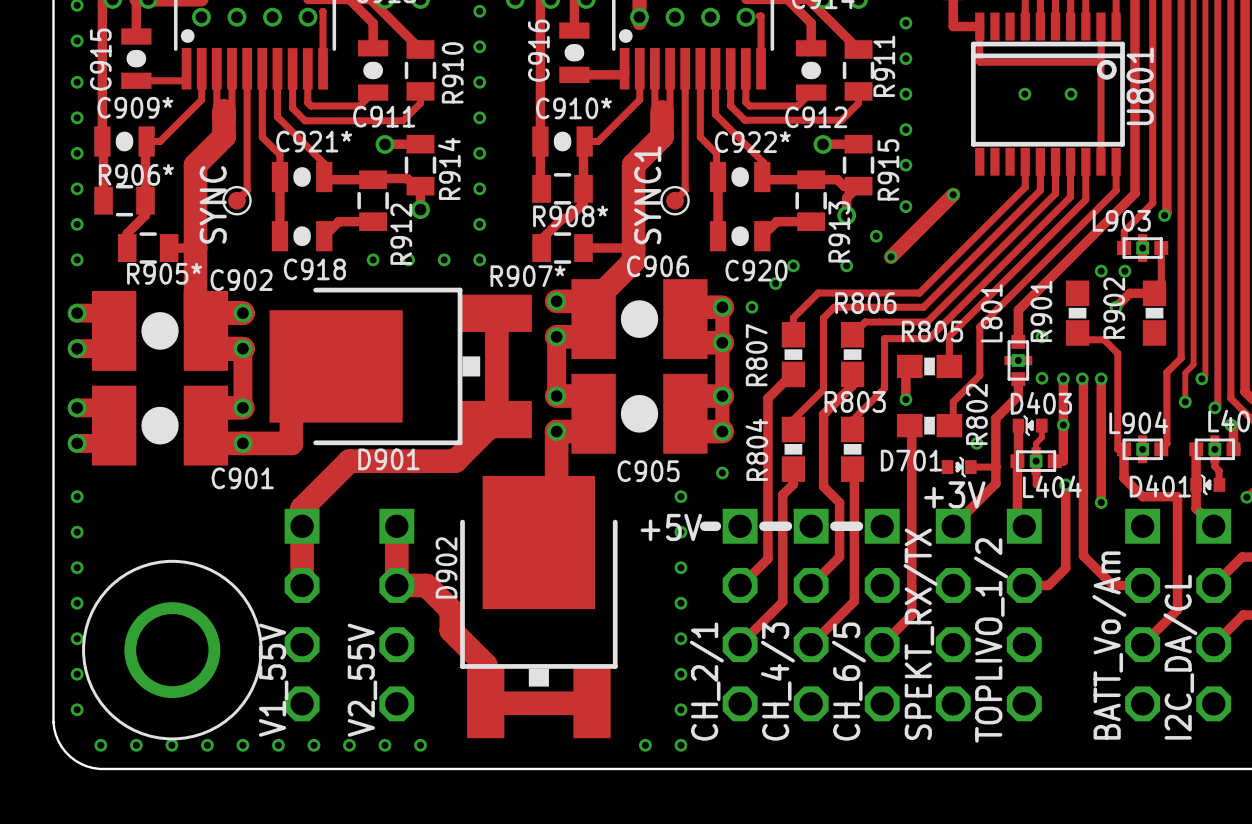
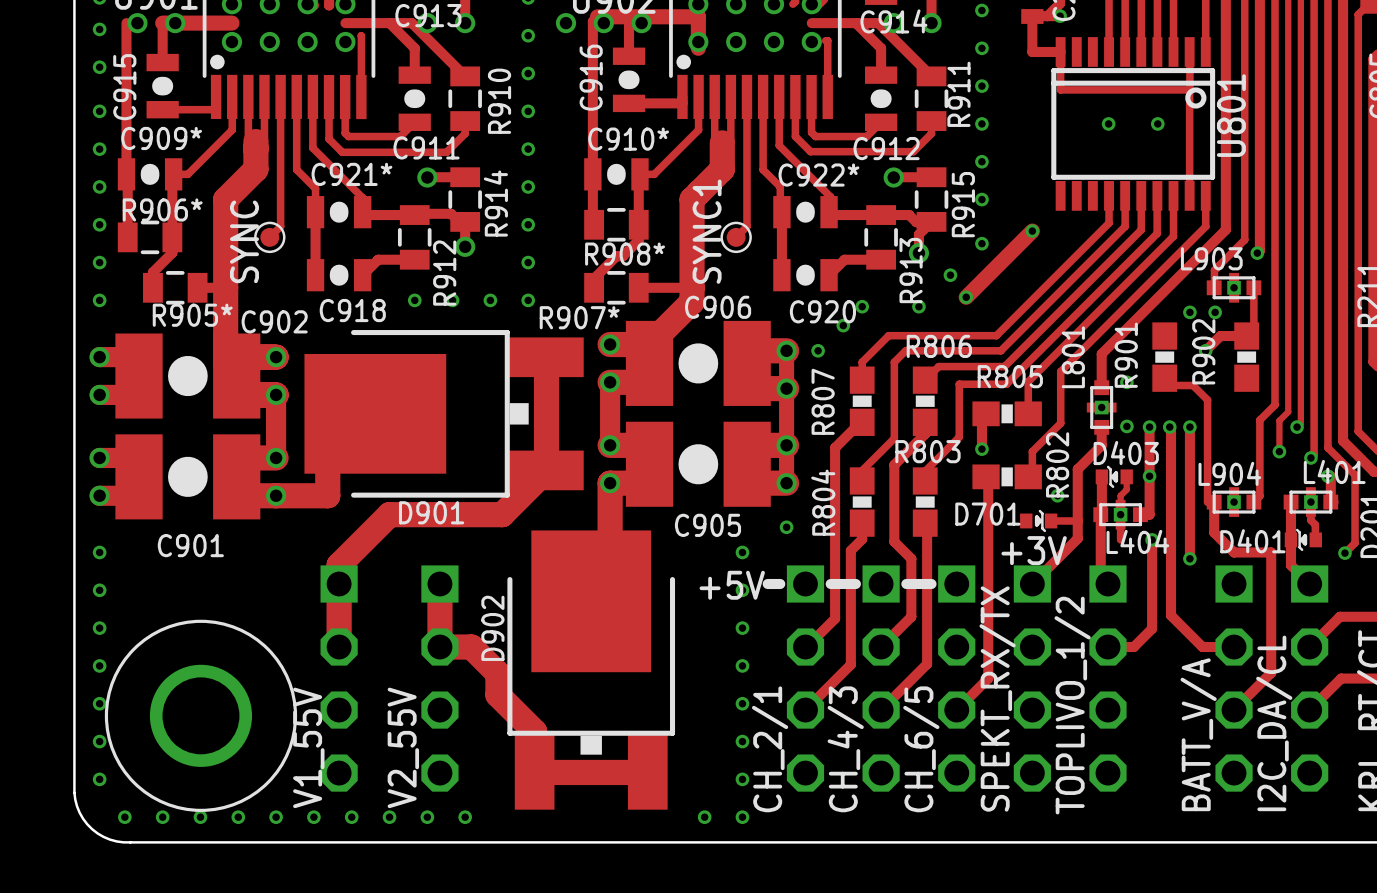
C901 name position: C901 (242, 478) -> C901 (190, 545)
text: BATT_Vo/Am (1109, 645) -> BATT_V/A (1198, 734)

